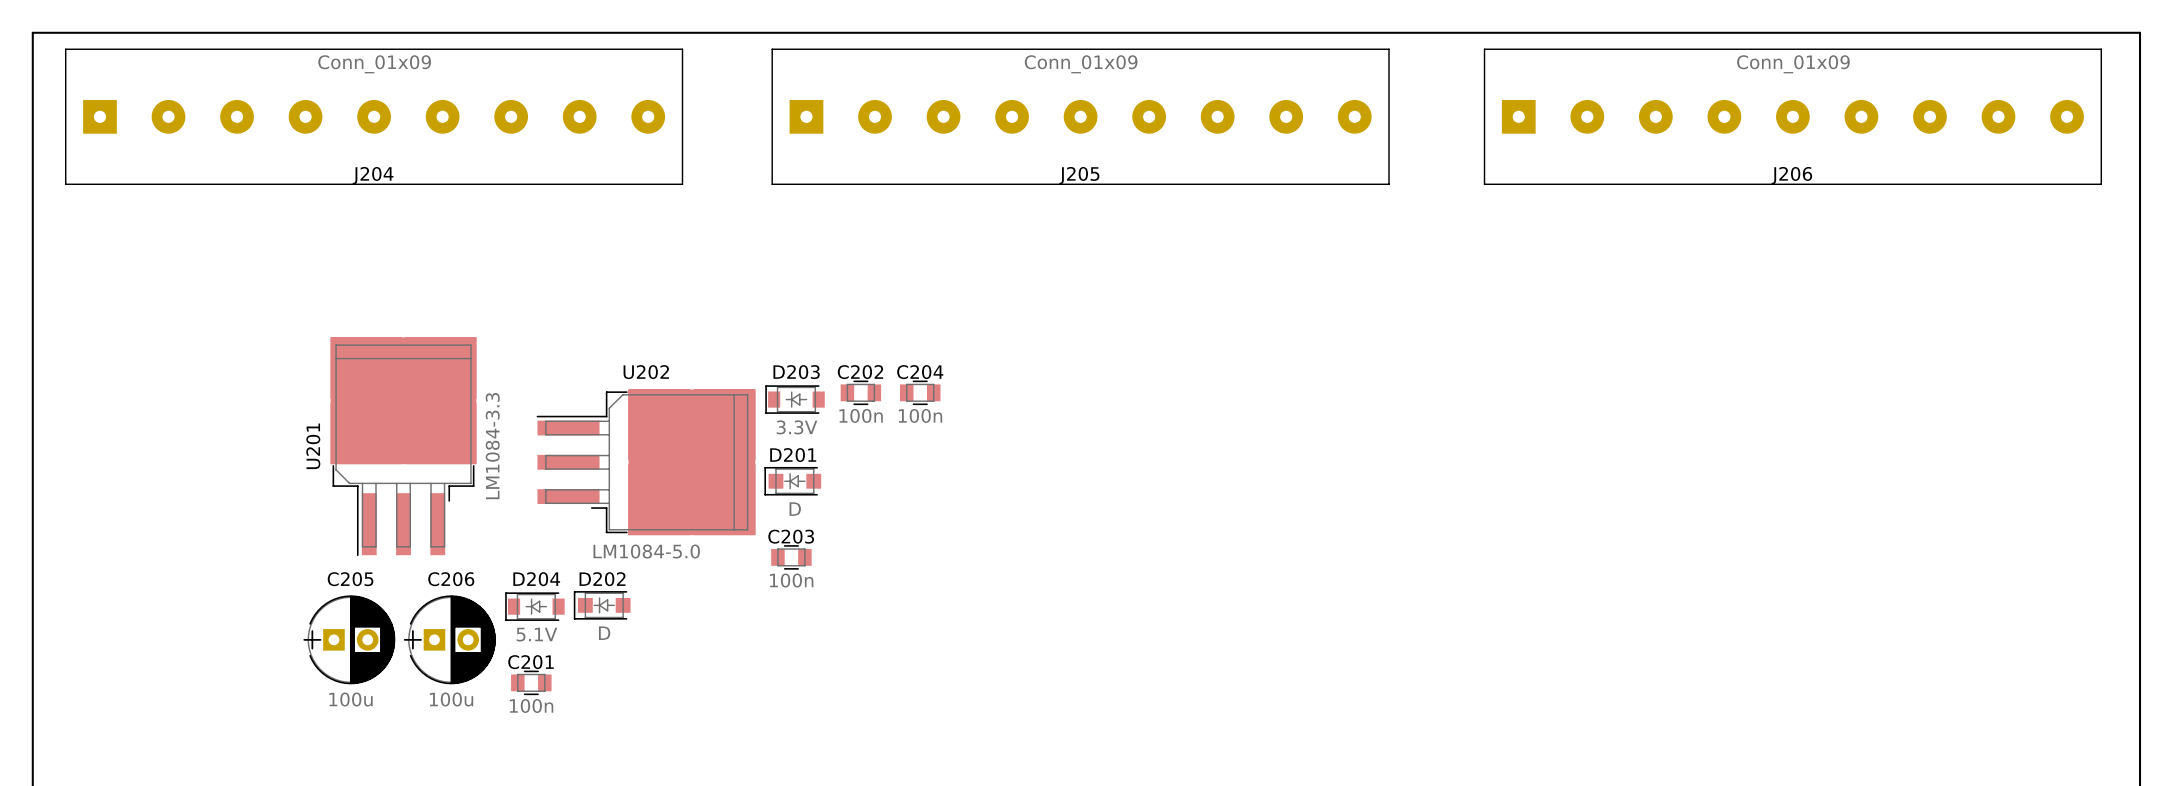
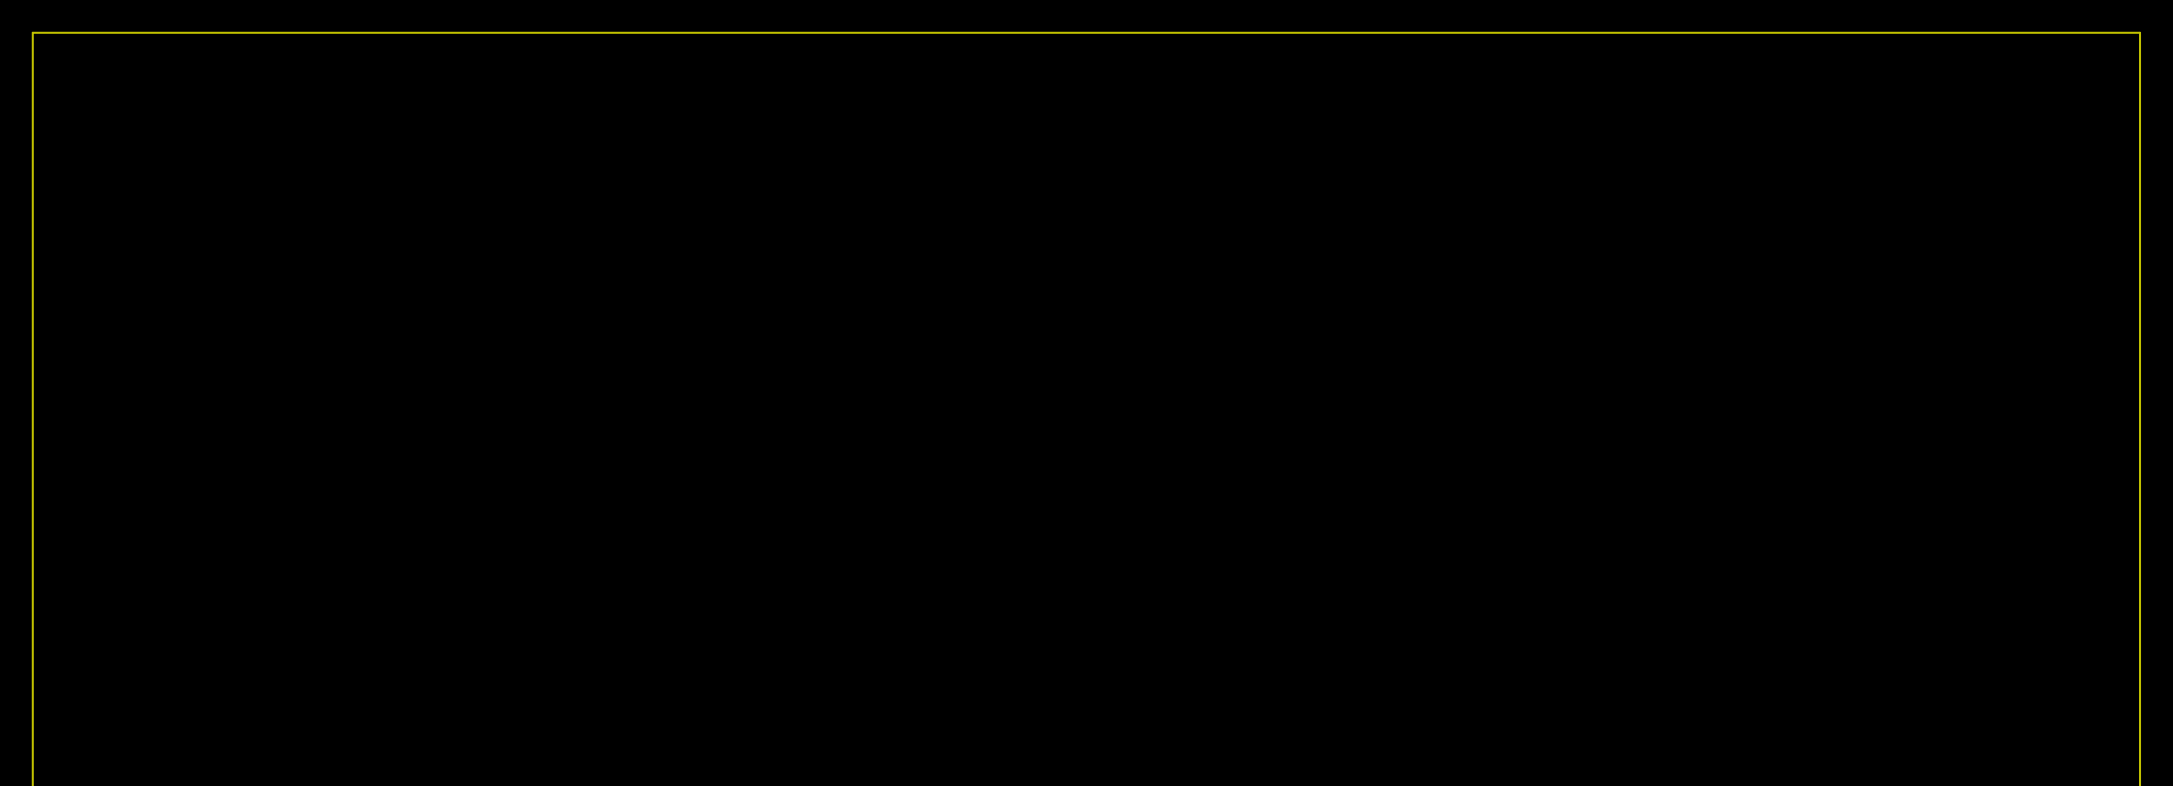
J204: Conn_01x09 (374, 116) -> none
J205: Conn_01x09 (1080, 116) -> none
J206: Conn_01x09 (1792, 116) -> none
C202: 100n (860, 392) -> none
C204: 100n (920, 392) -> none
D203: 3.3V (795, 399) -> none
U201: LM1084-3.3 (403, 446) -> none
U202: LM1084-5.0 (646, 462) -> none
D201: D (792, 481) -> none
C203: 100n (791, 557) -> none
D202: D (602, 605) -> none
D204: 5.1V (534, 606) -> none
C205: 100u (349, 639) -> none
C206: 100u (449, 639) -> none
C201: 100n (531, 682) -> none

